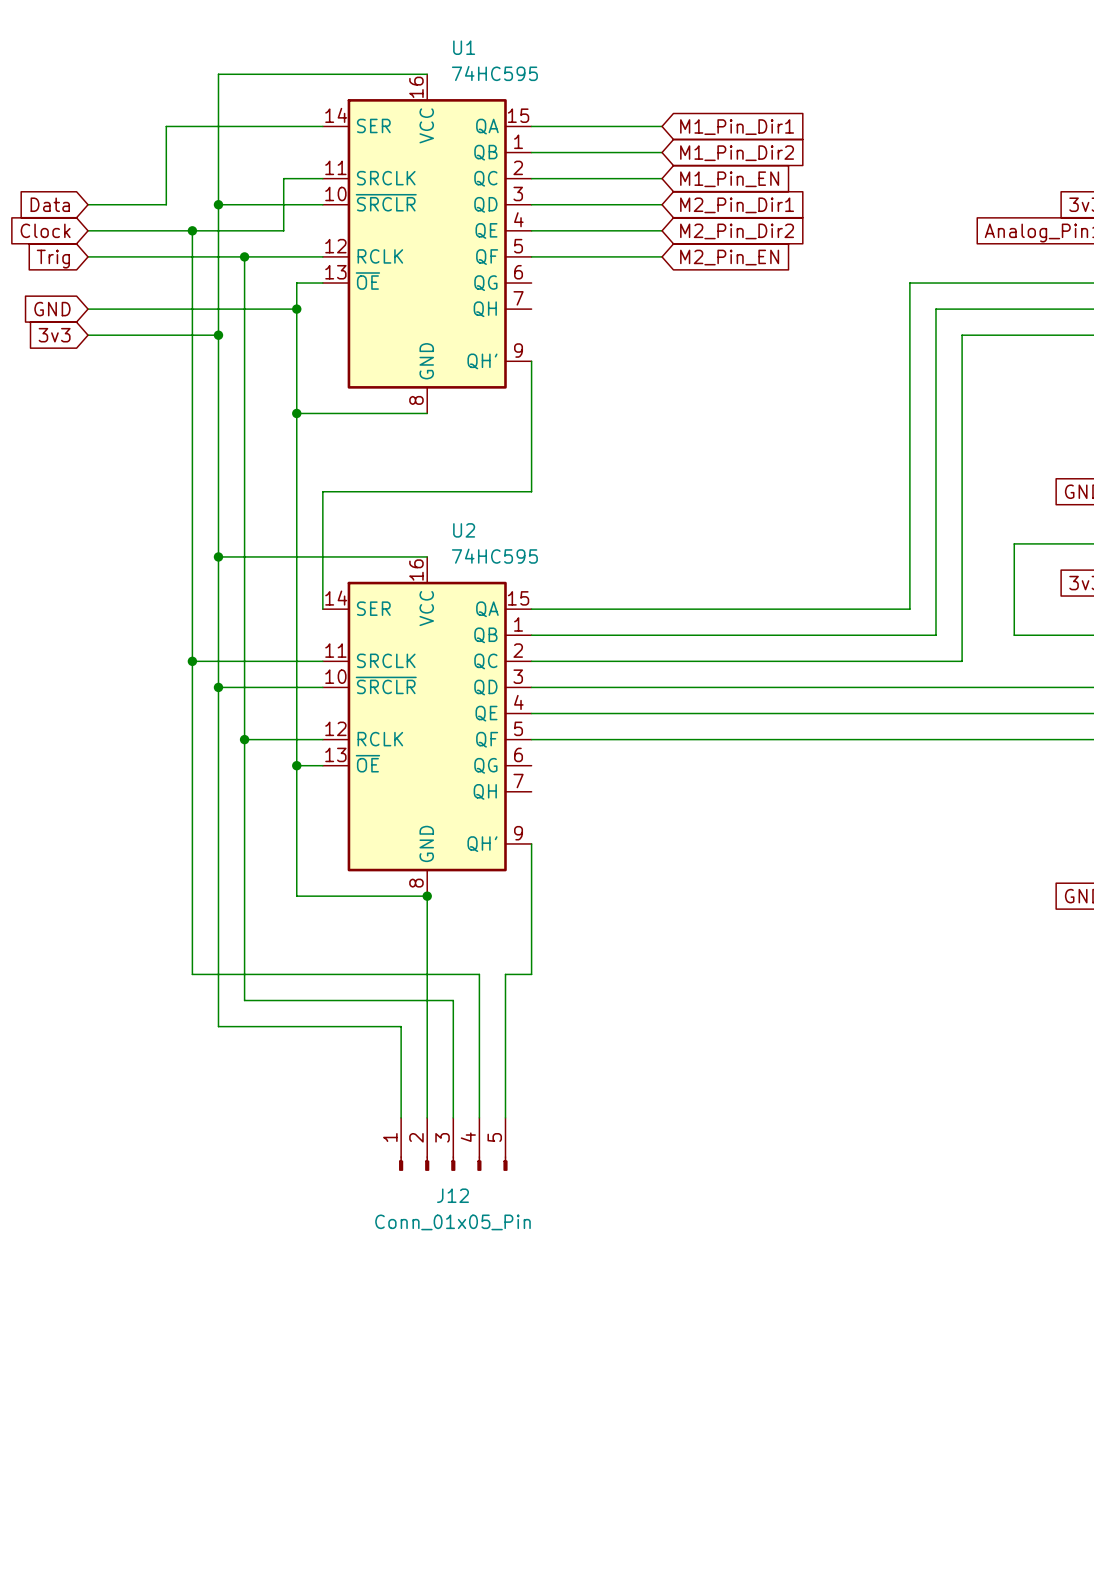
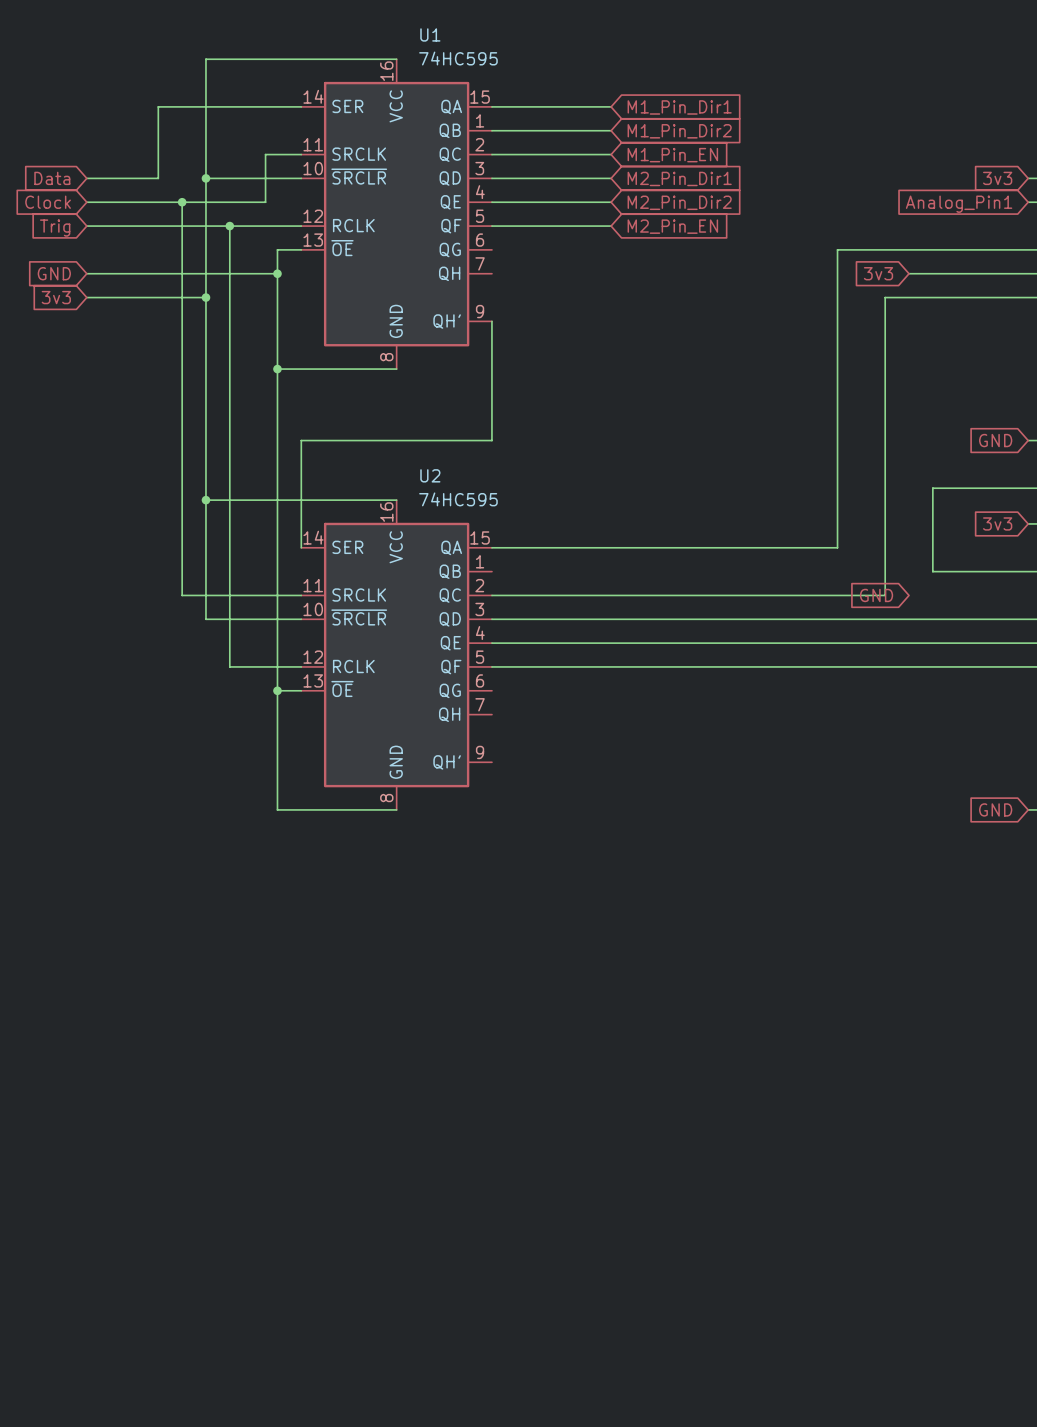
global label: none -> 3v3 (878, 273)
wire: (988, 309) (935, 309) (935, 635) (531, 635) -> none
wire: (192, 661) (192, 974) (479, 974) (479, 1117) -> none
junction: (192, 661) -> none
global label: none -> GND (876, 595)
wire: (218, 687) (218, 1026) (401, 1026) (401, 1117) -> none
junction: (218, 687) -> none
wire: (244, 739) (244, 1000) (453, 1000) (453, 1117) -> none
junction: (244, 739) -> none
wire: (531, 843) (531, 974) (505, 974) (505, 1117) -> none
wire: (427, 896) (427, 1117) -> none
junction: (427, 896) -> none
J12: Conn_01x05_Pin (453, 1144) -> none

